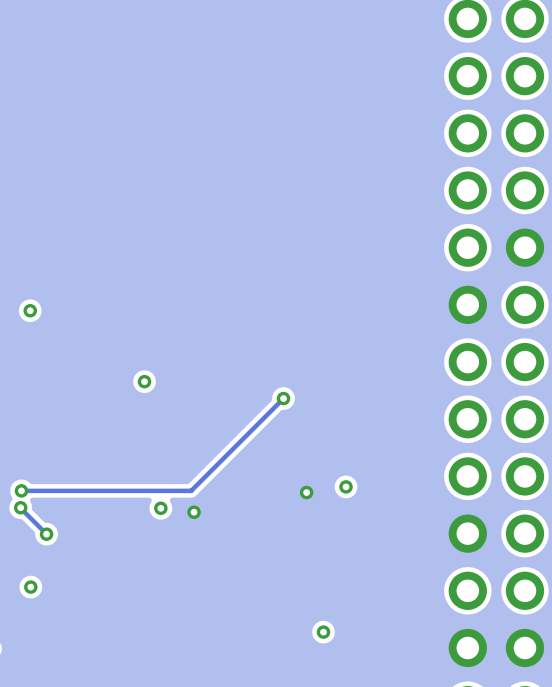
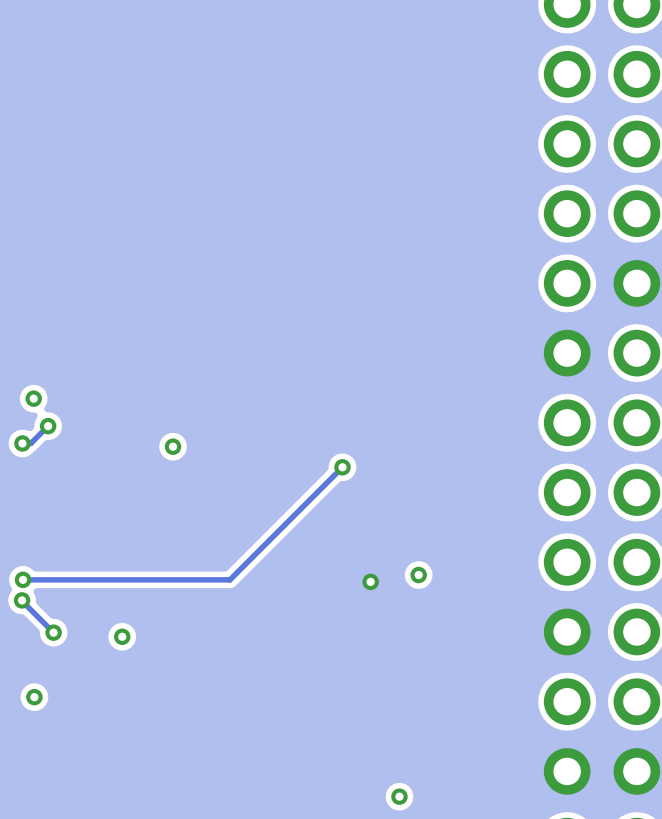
via: (30, 310) -> none
via: none -> (33, 398)
track: none -> (48, 426) (30, 443) (22, 443)
via: none -> (48, 426)
via: none -> (22, 443)
via: (160, 508) -> none
via: (194, 512) -> none
via: none -> (122, 636)
via position: (323, 632) -> (399, 796)

